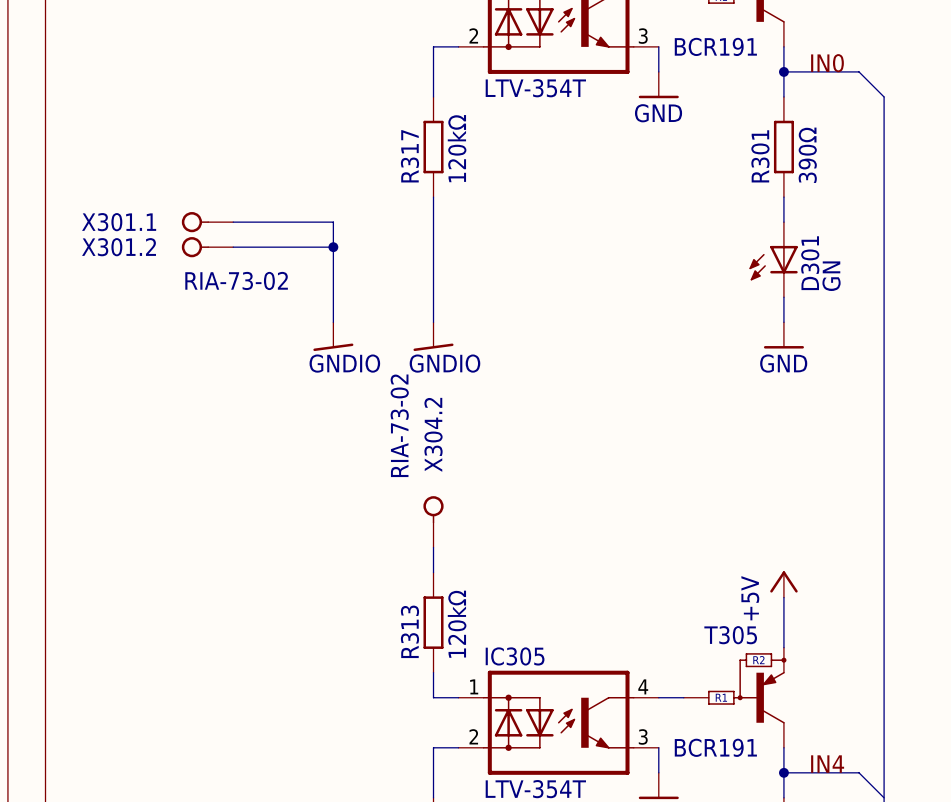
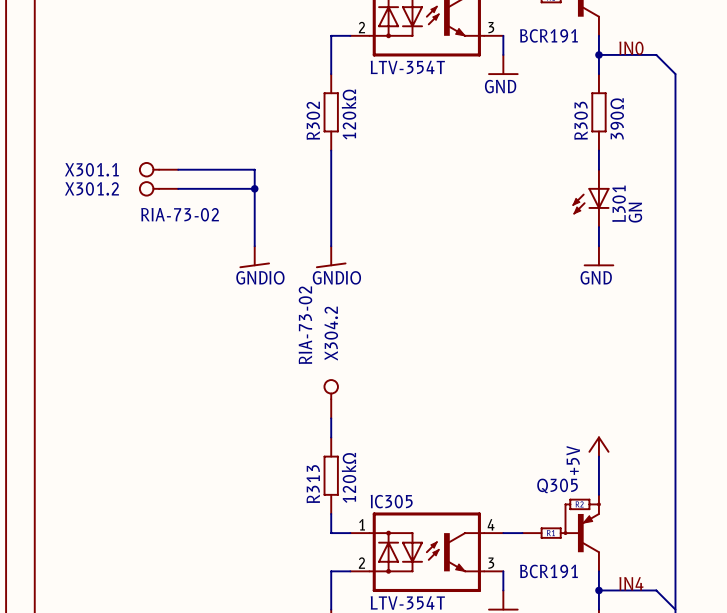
R317 name: R317 (409, 156) -> R302 (313, 120)
R301 name: R301 (760, 156) -> R303 (581, 120)
D301 name: D301 (810, 263) -> L301 (619, 203)
T305 name: T305 (730, 635) -> Q305 (557, 485)

